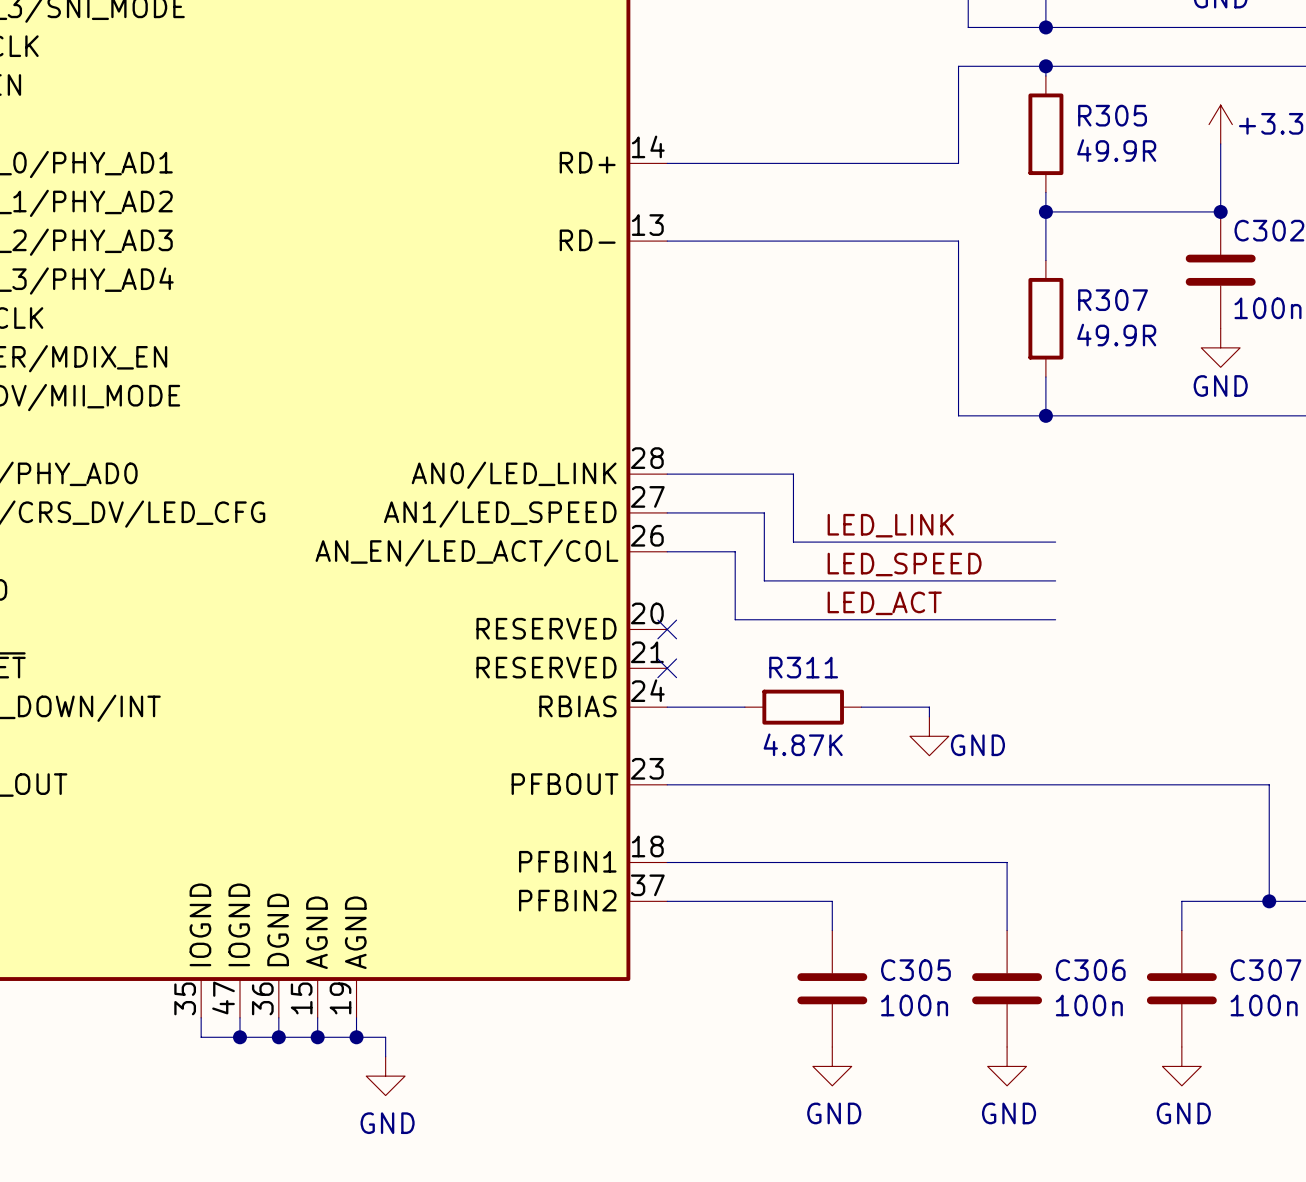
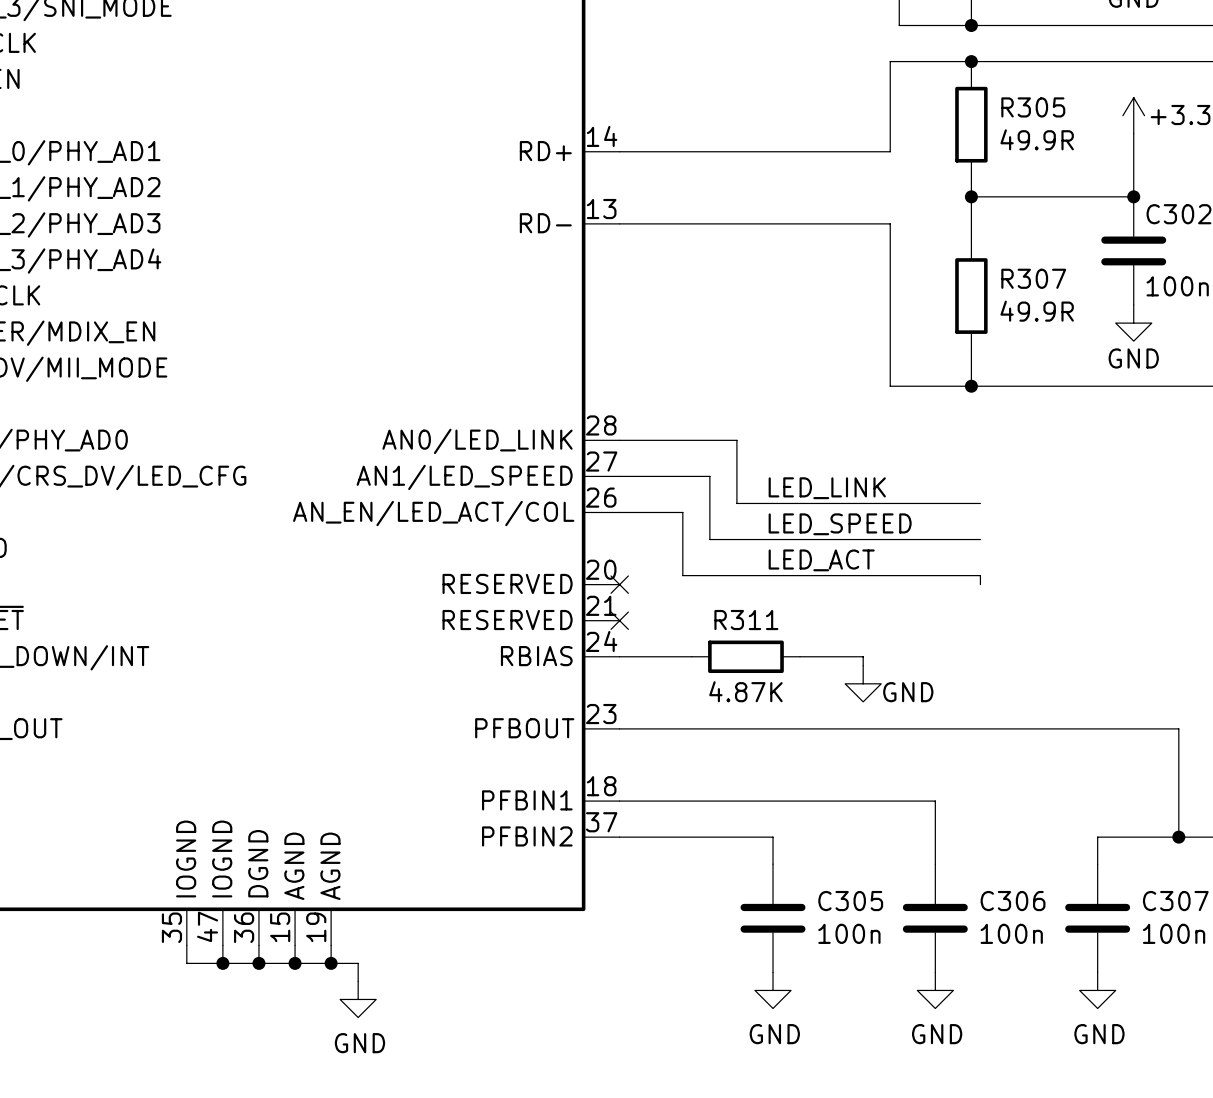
wire: none -> (980, 575) (980, 584)

